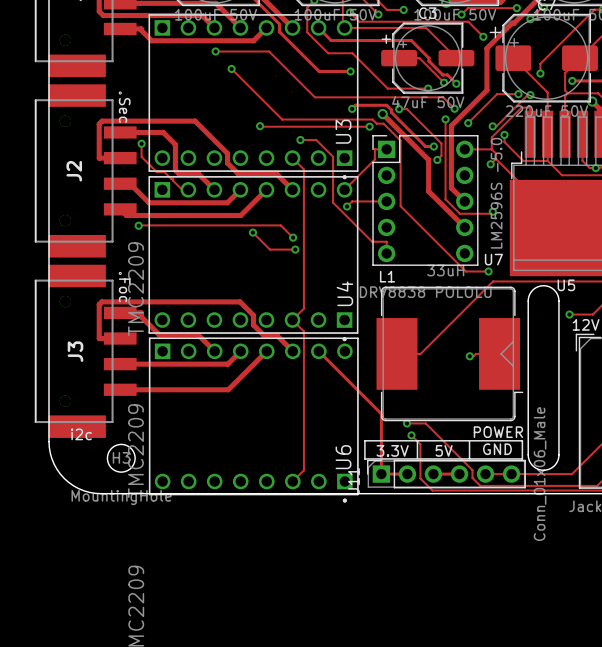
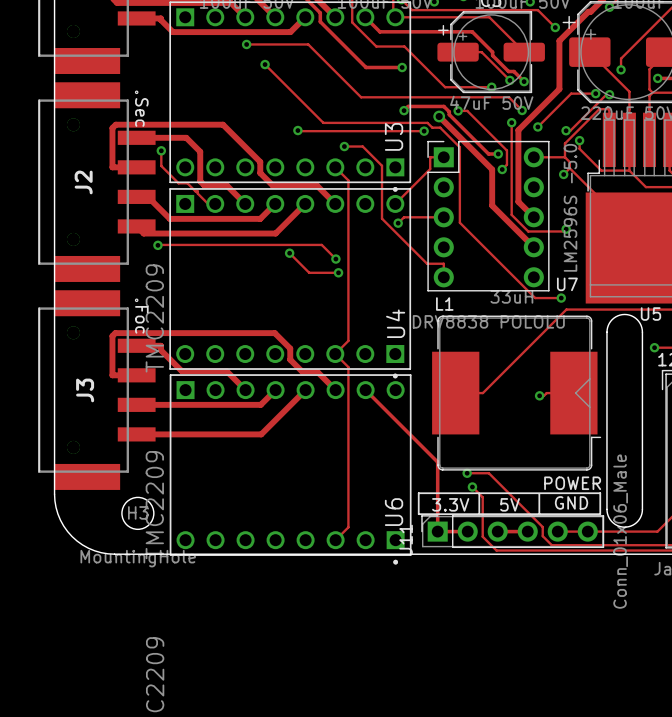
text: i2c (81, 434) -> none

